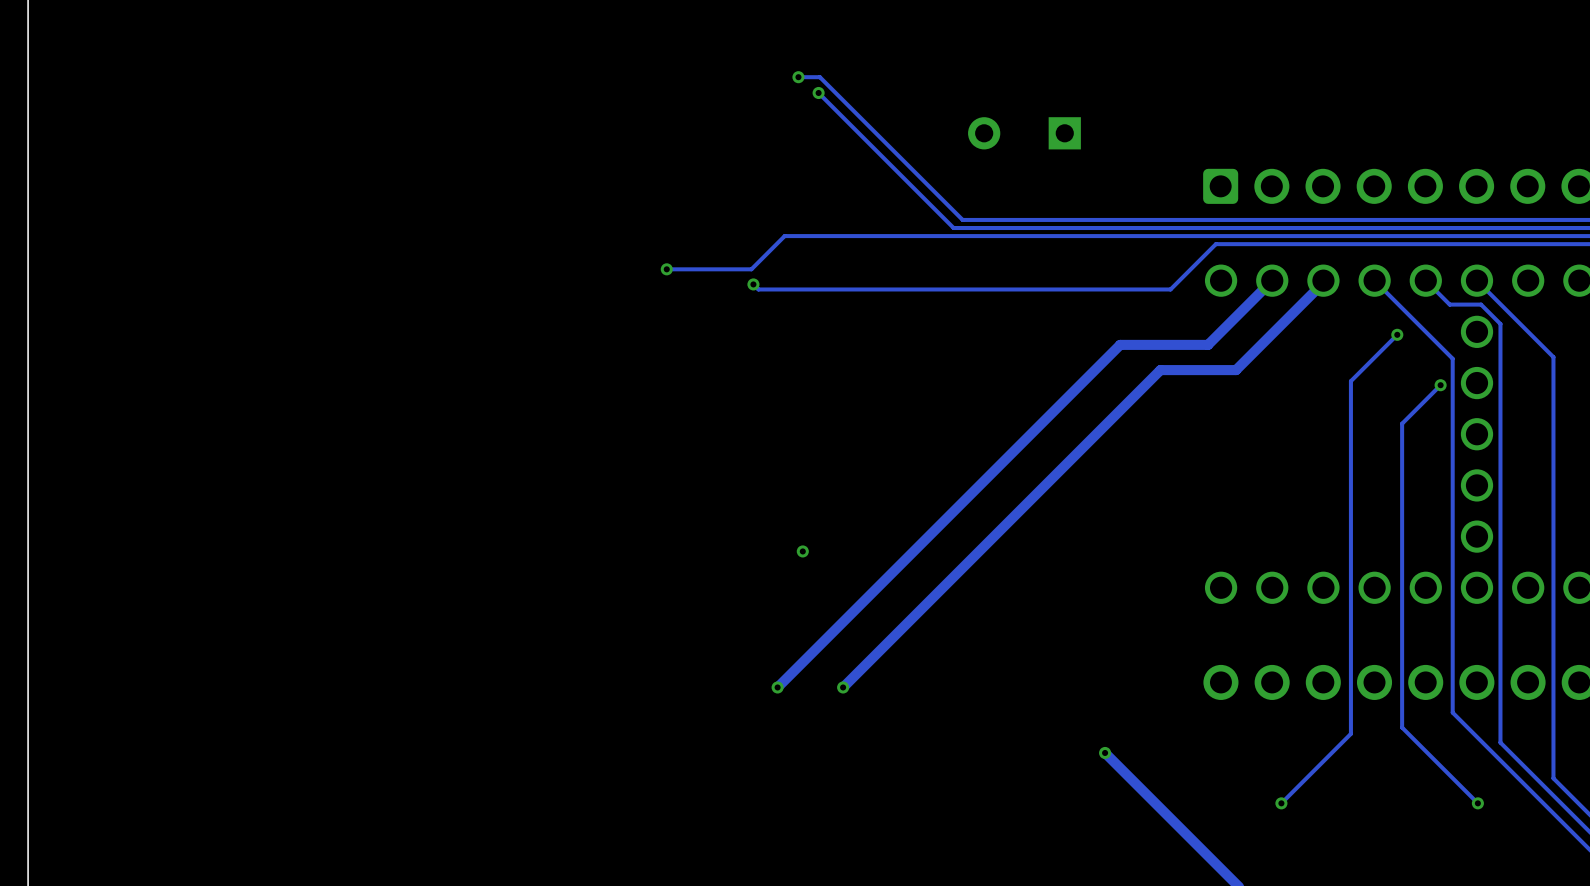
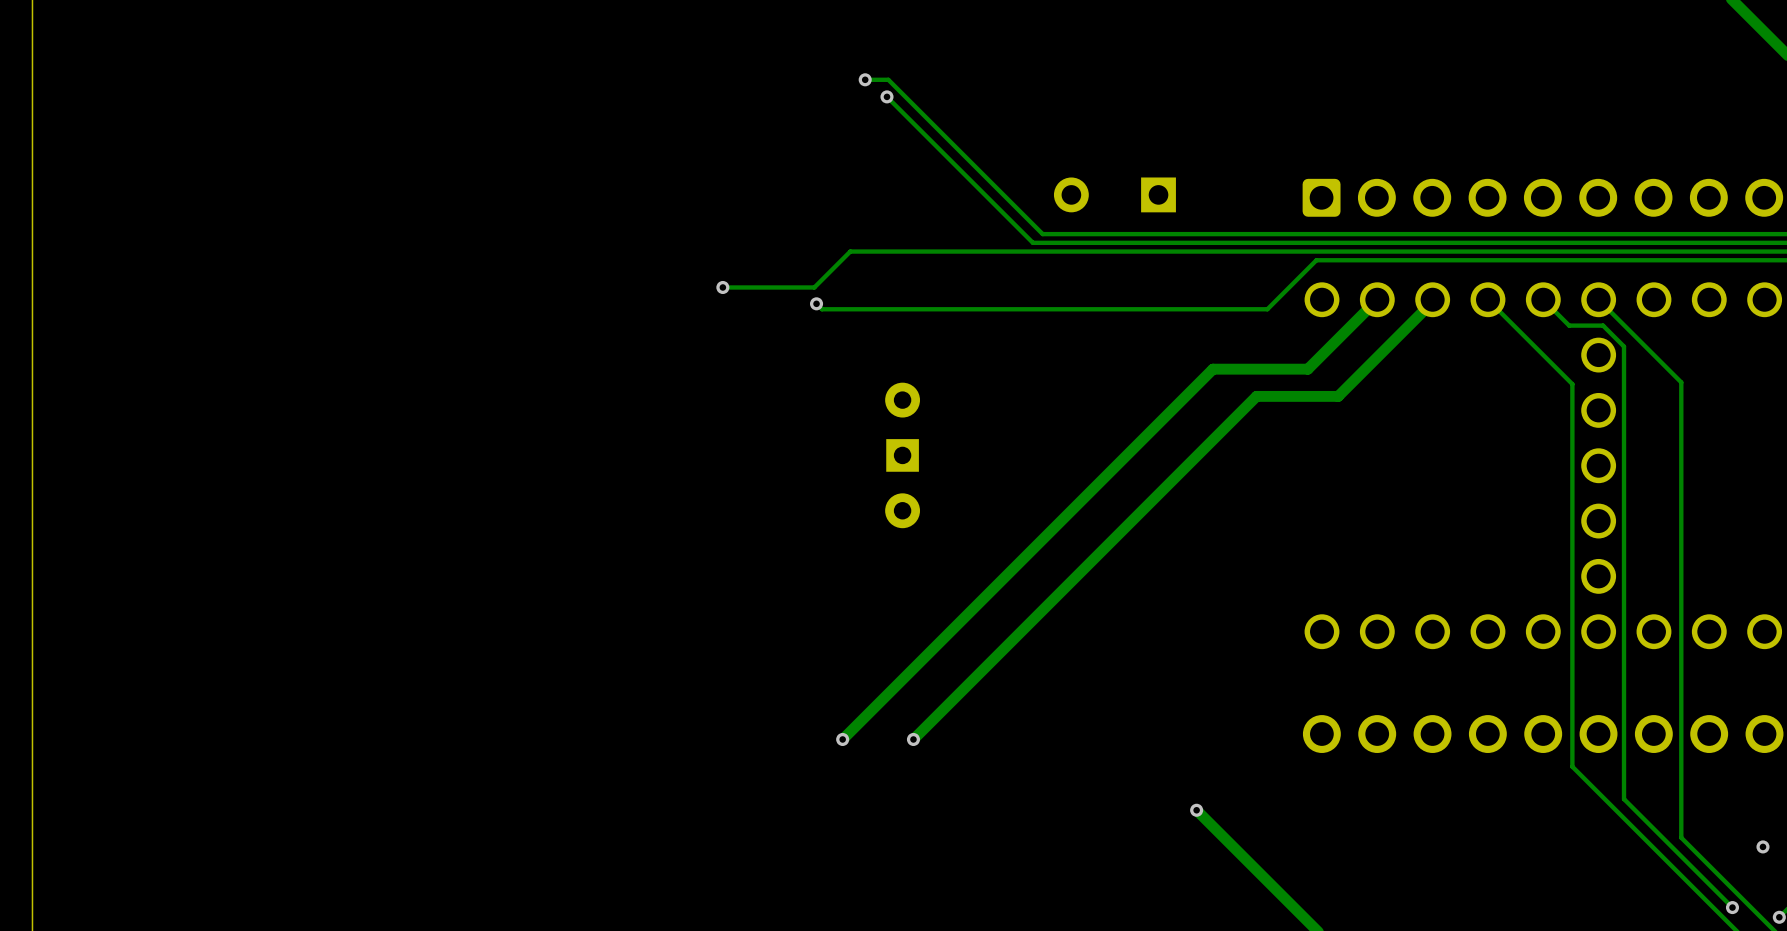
part position: (1024, 133) -> (1114, 194)
track: (1397, 334) (1350, 381) (1350, 733) (1281, 803) -> none
via: (1397, 334) -> none
track: (1440, 385) (1402, 423) (1402, 727) (1477, 803) -> none
via: (1440, 385) -> none
part: none -> (902, 455)
via: (802, 551) -> none
via: (1281, 803) -> none
via: (1477, 803) -> none

